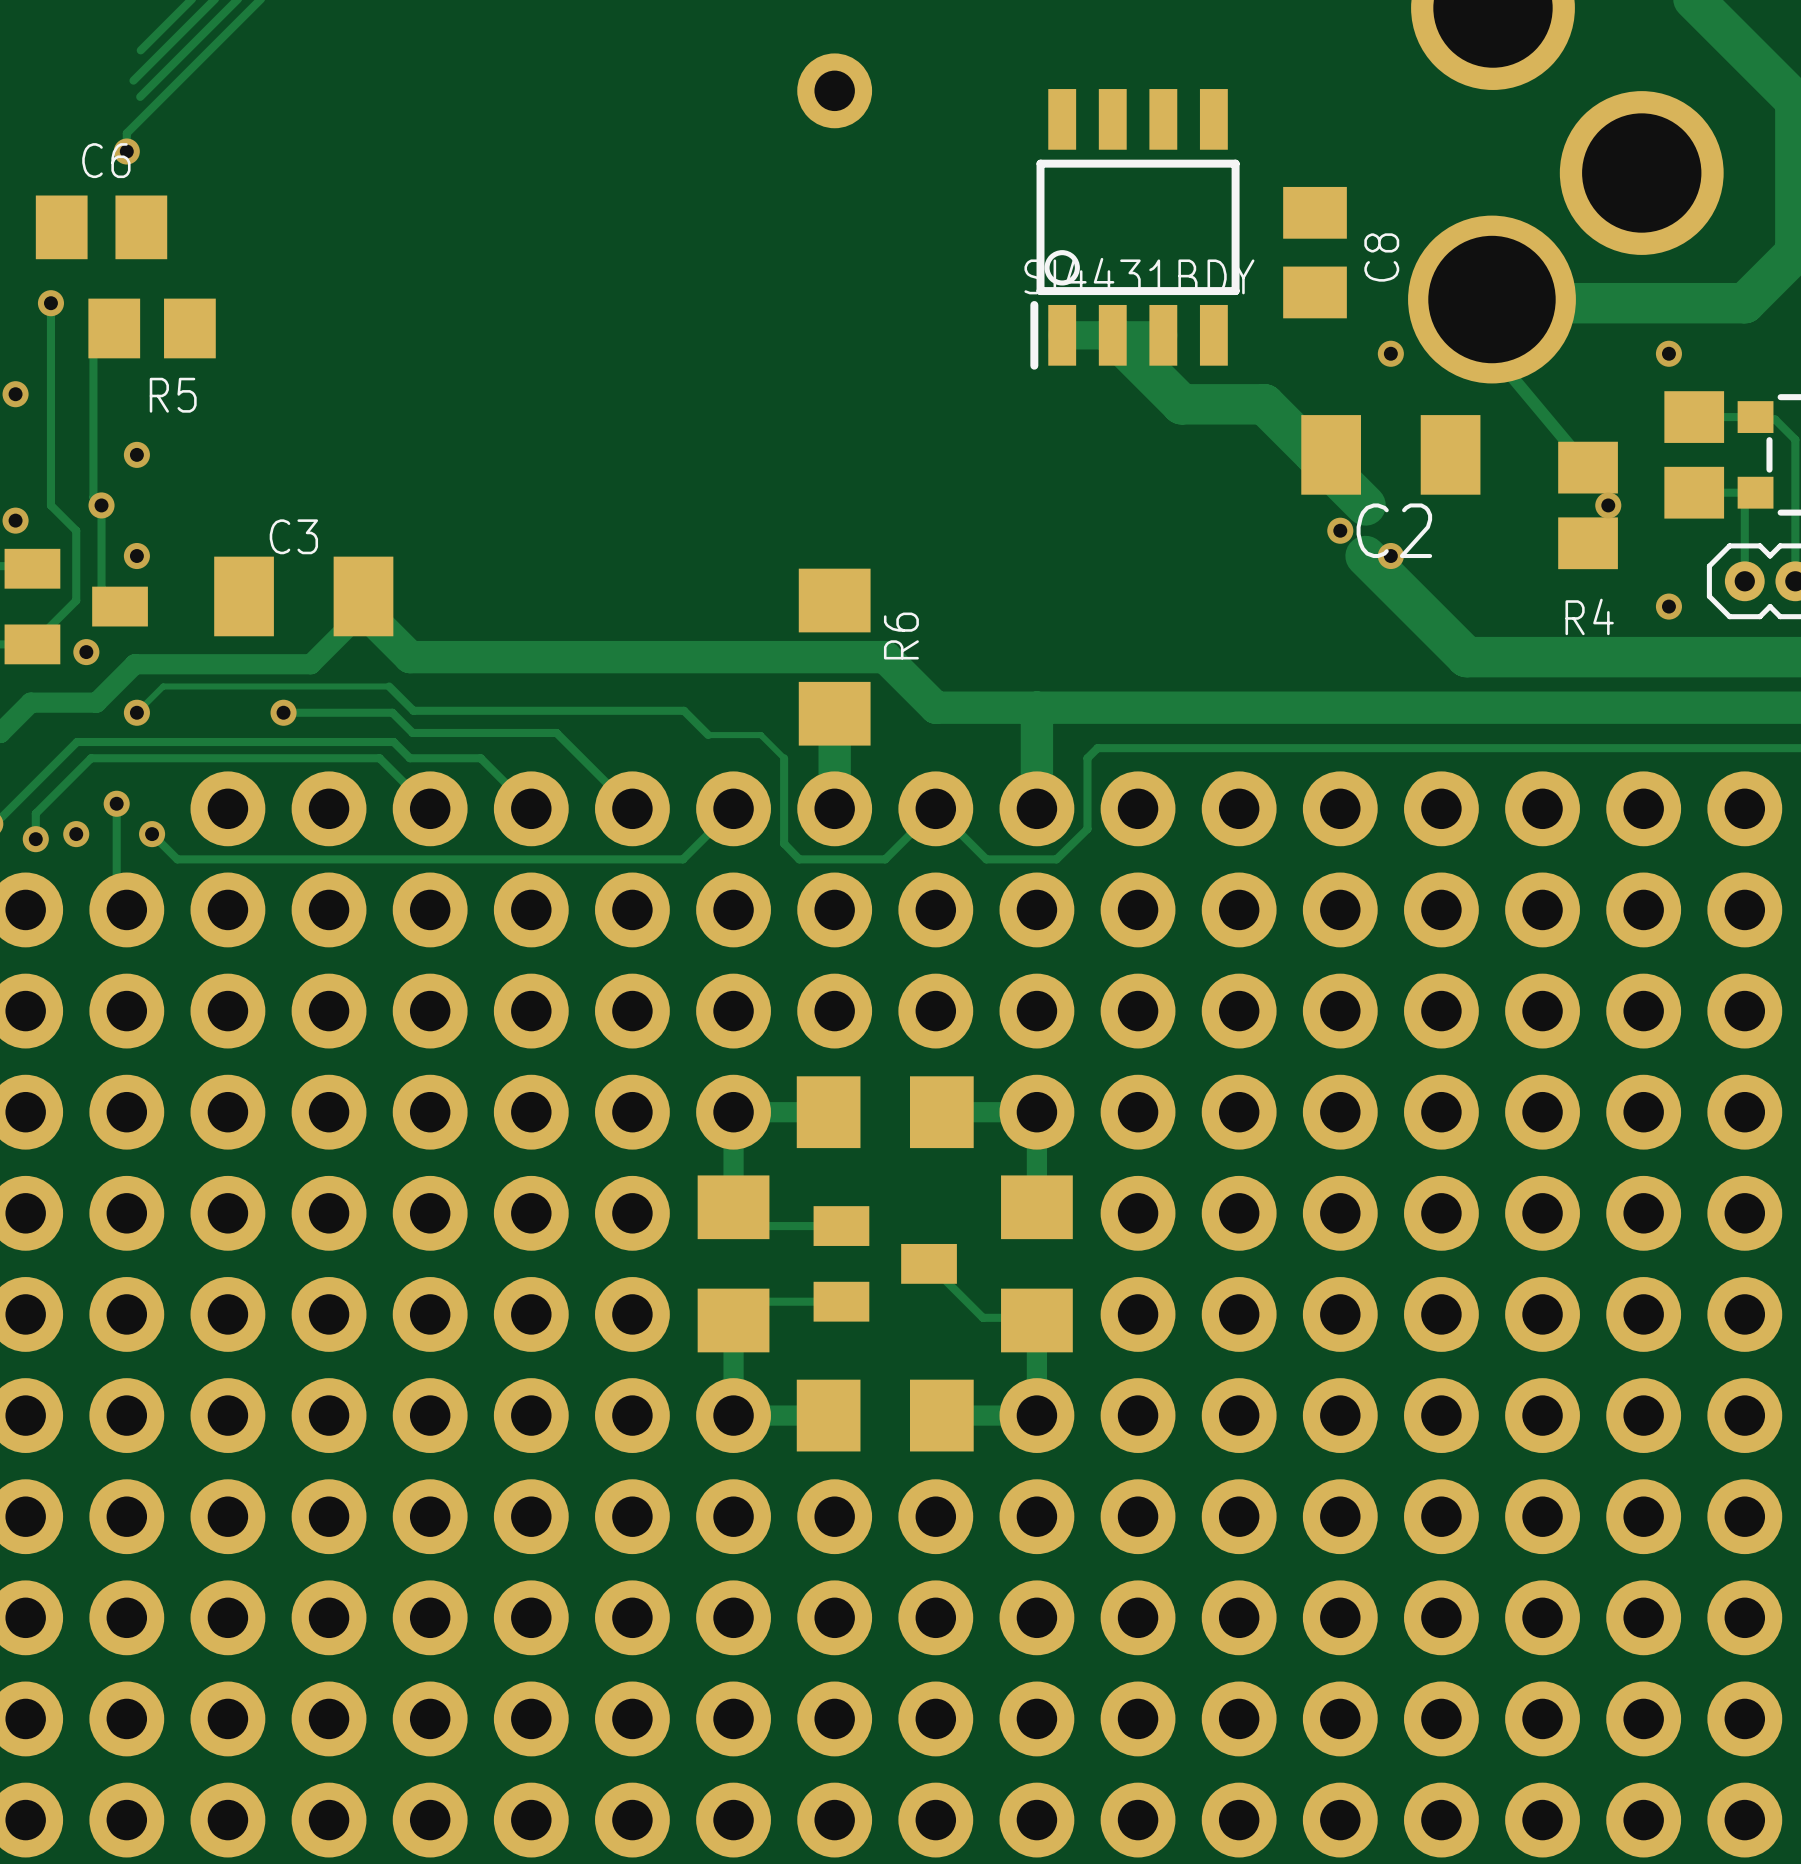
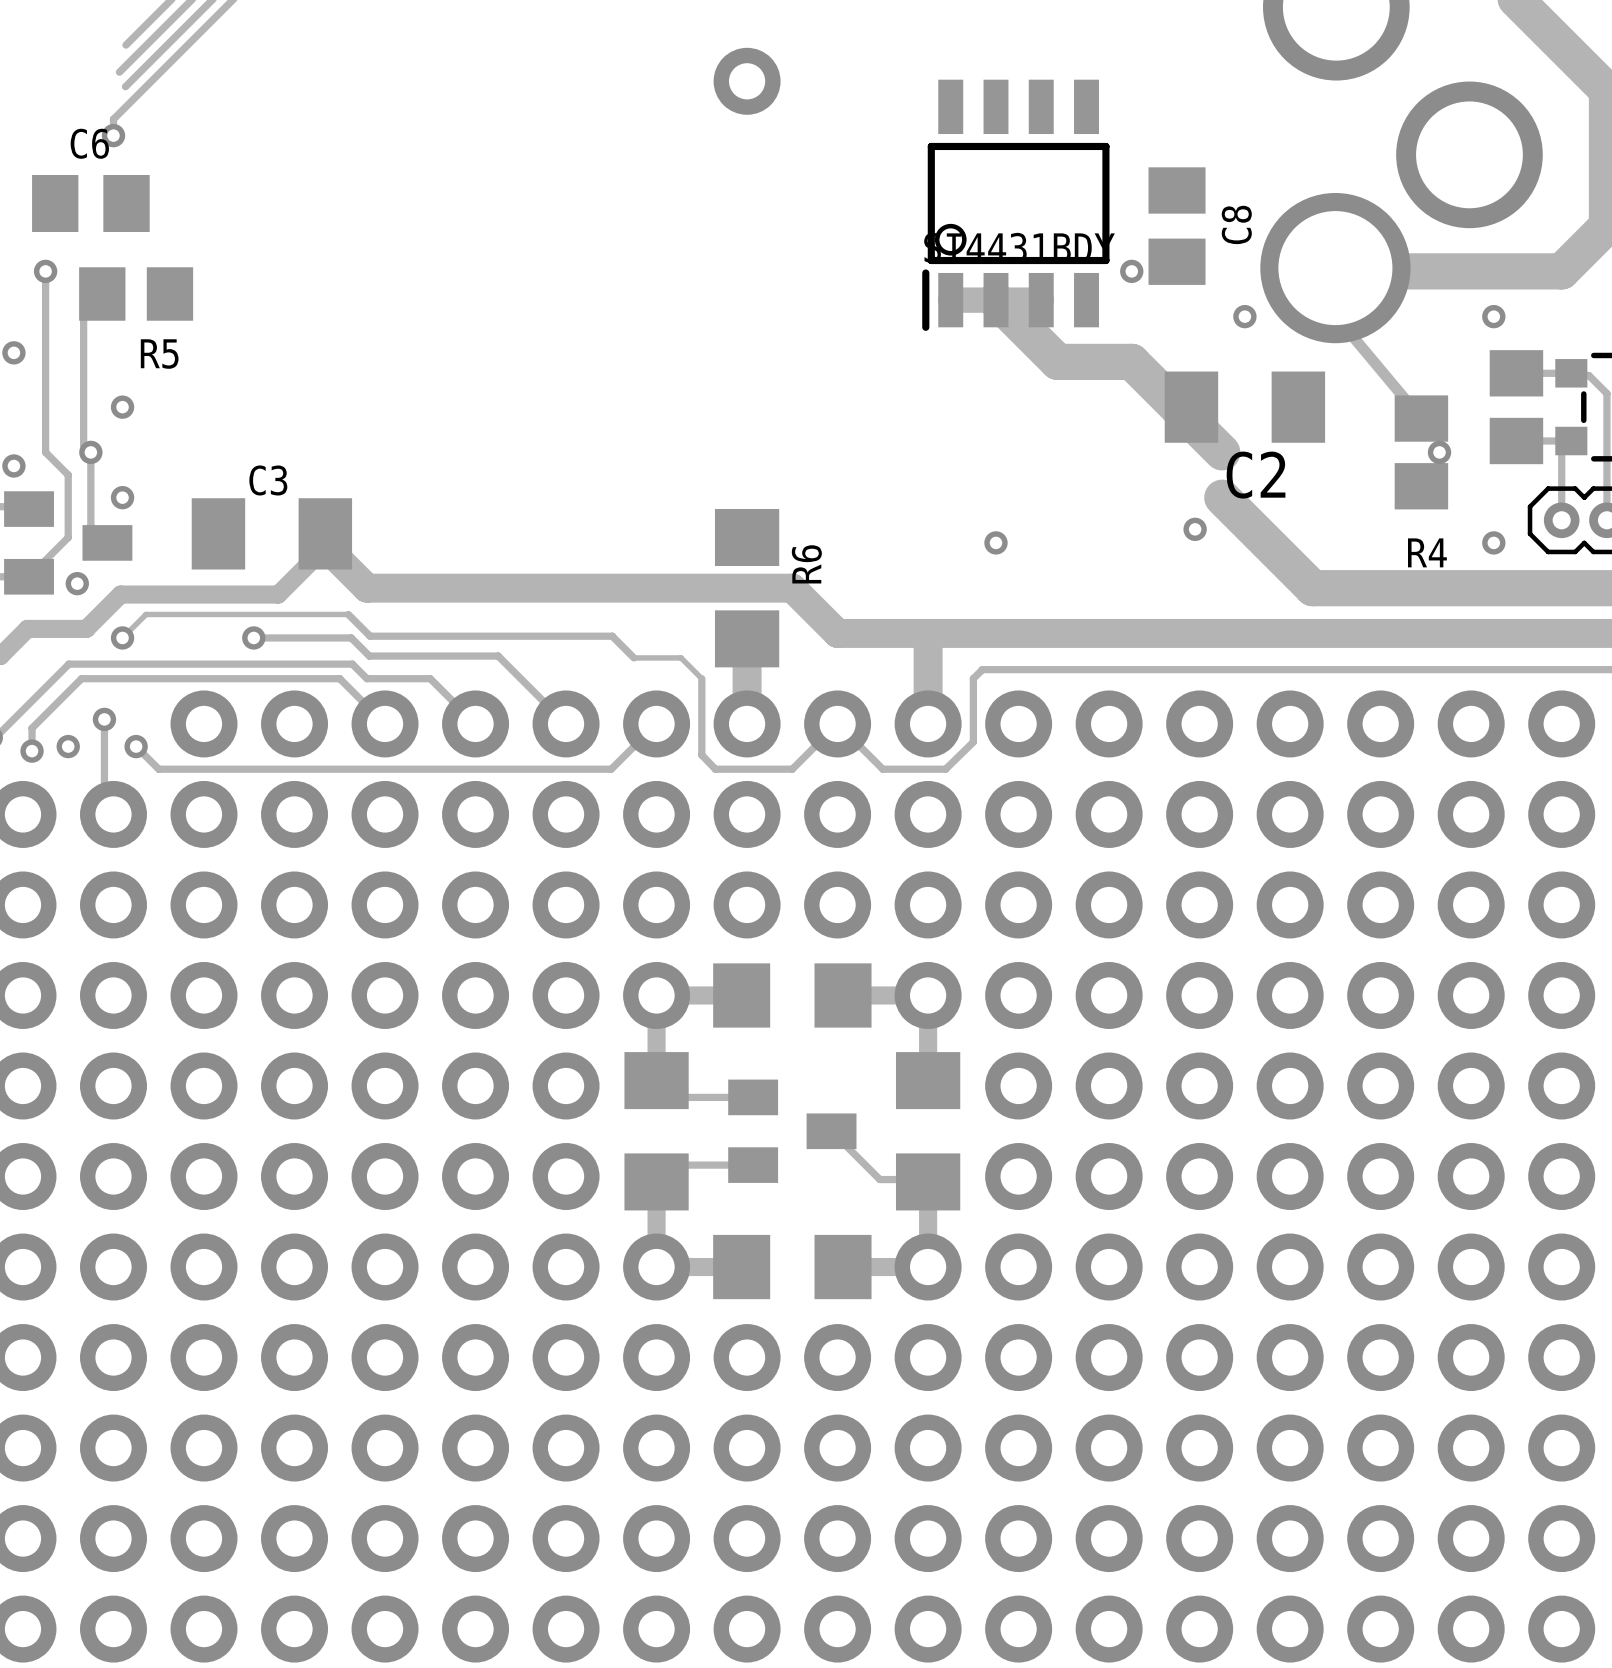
via: none -> (1131, 271)
via: (1340, 530) -> none
via: (1390, 556) -> none
via: none -> (1195, 529)
via: none -> (995, 542)

